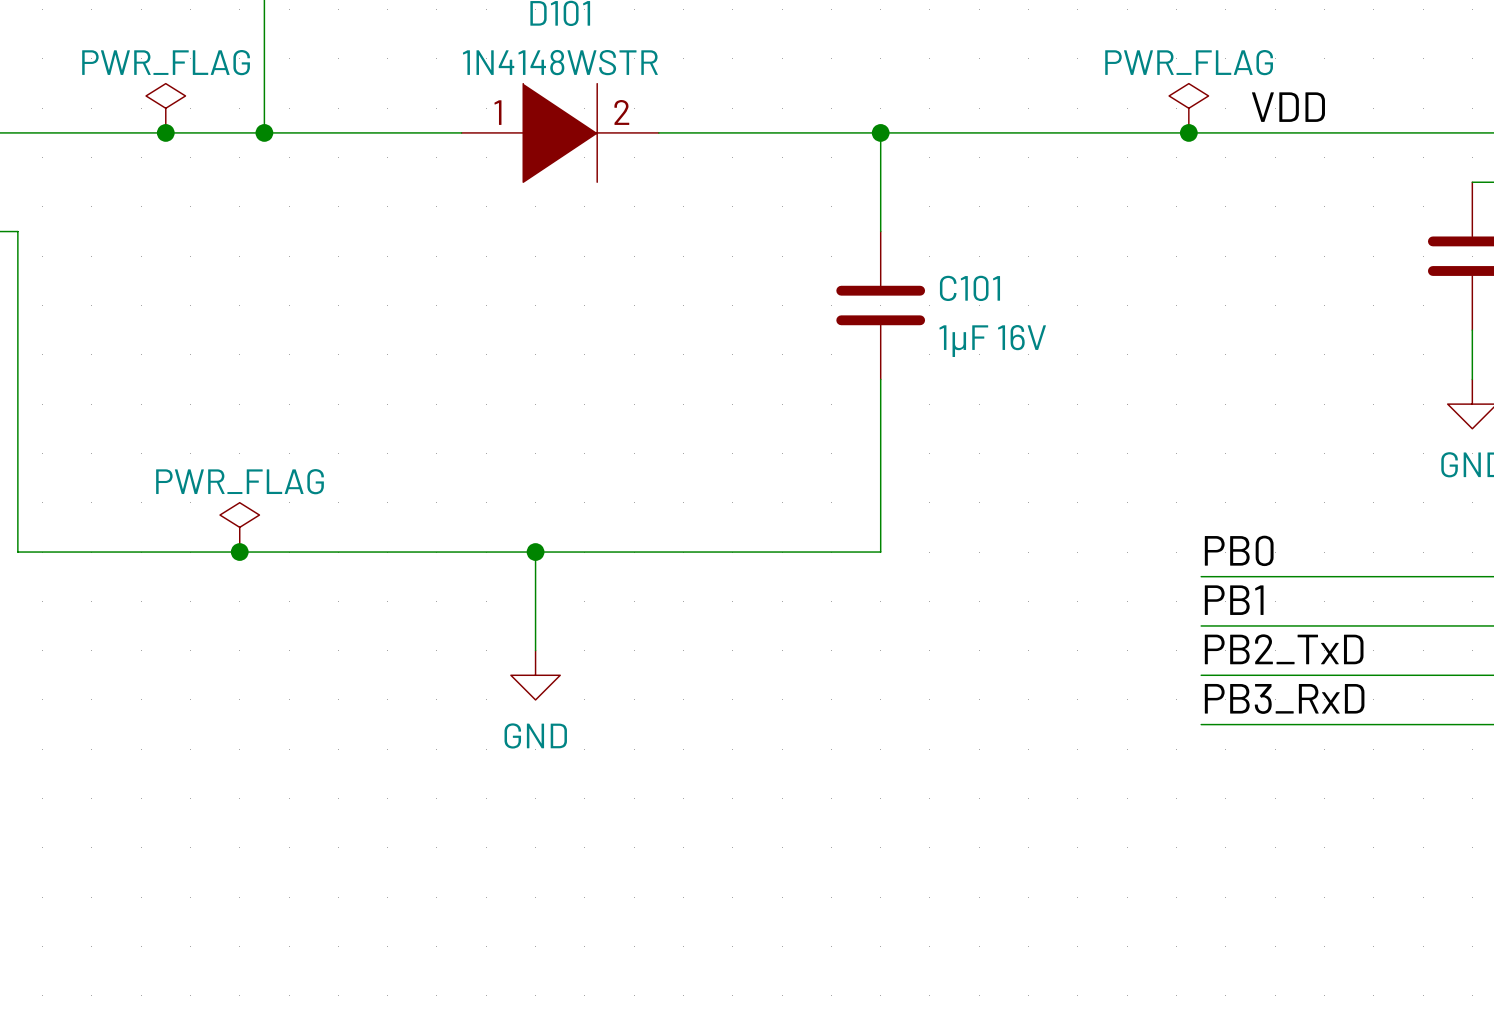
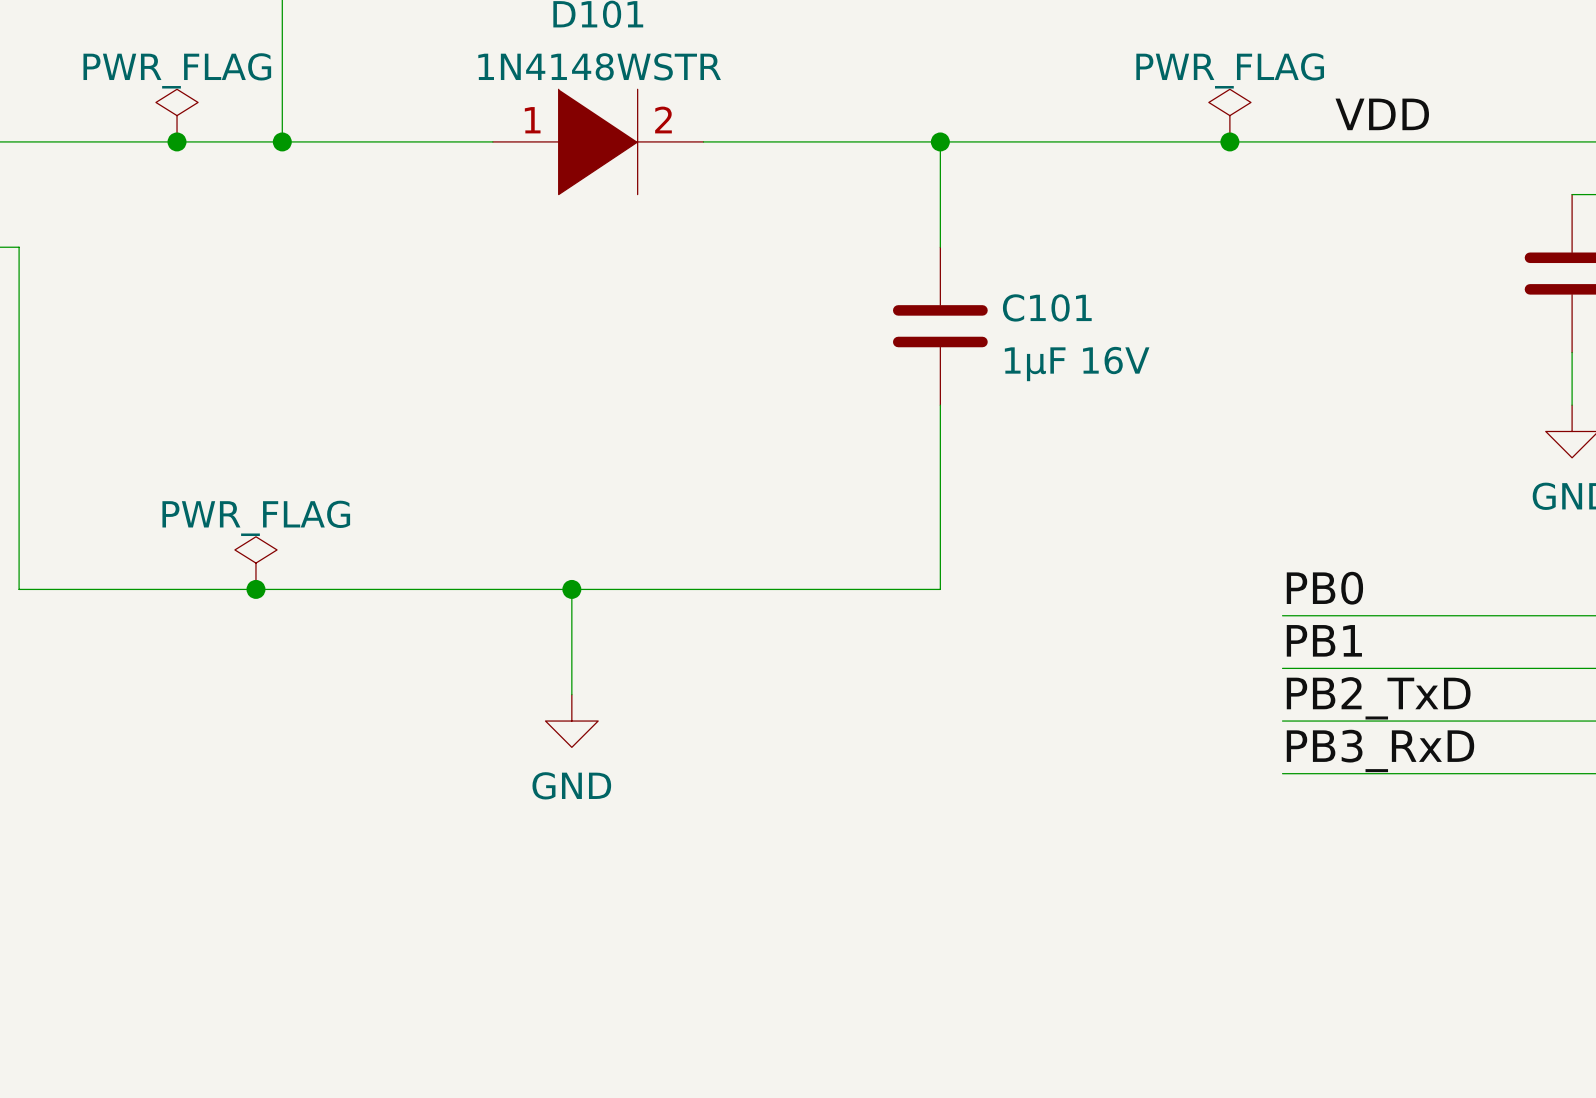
power symbol position: PWR_FLAG (1188, 108) -> PWR_FLAG (1229, 115)
junction position: (1188, 132) -> (1229, 141)

